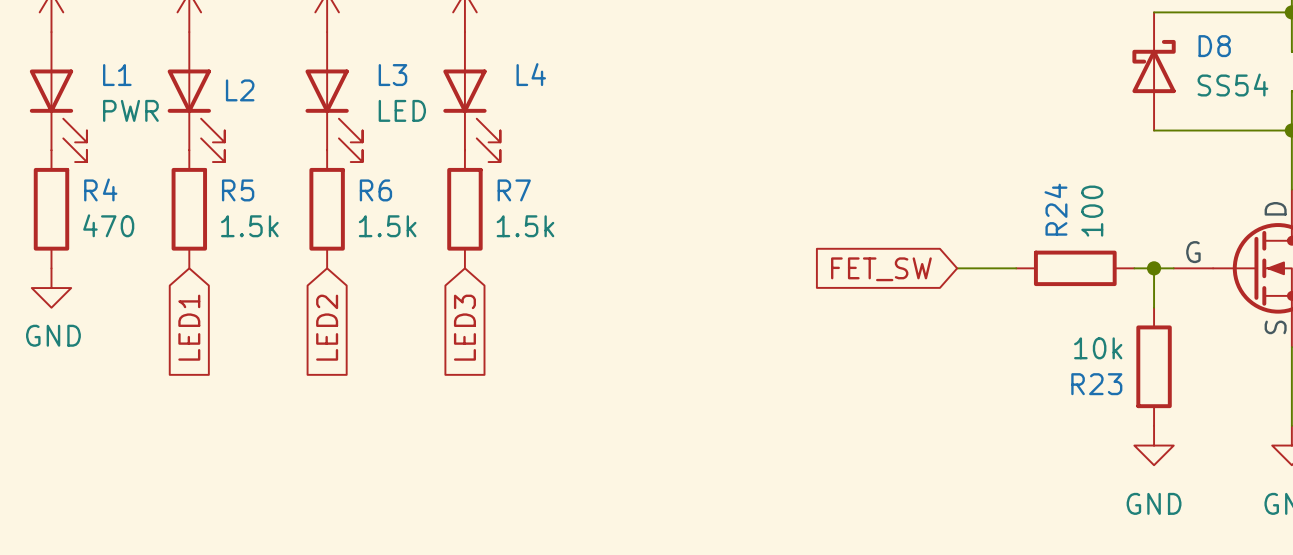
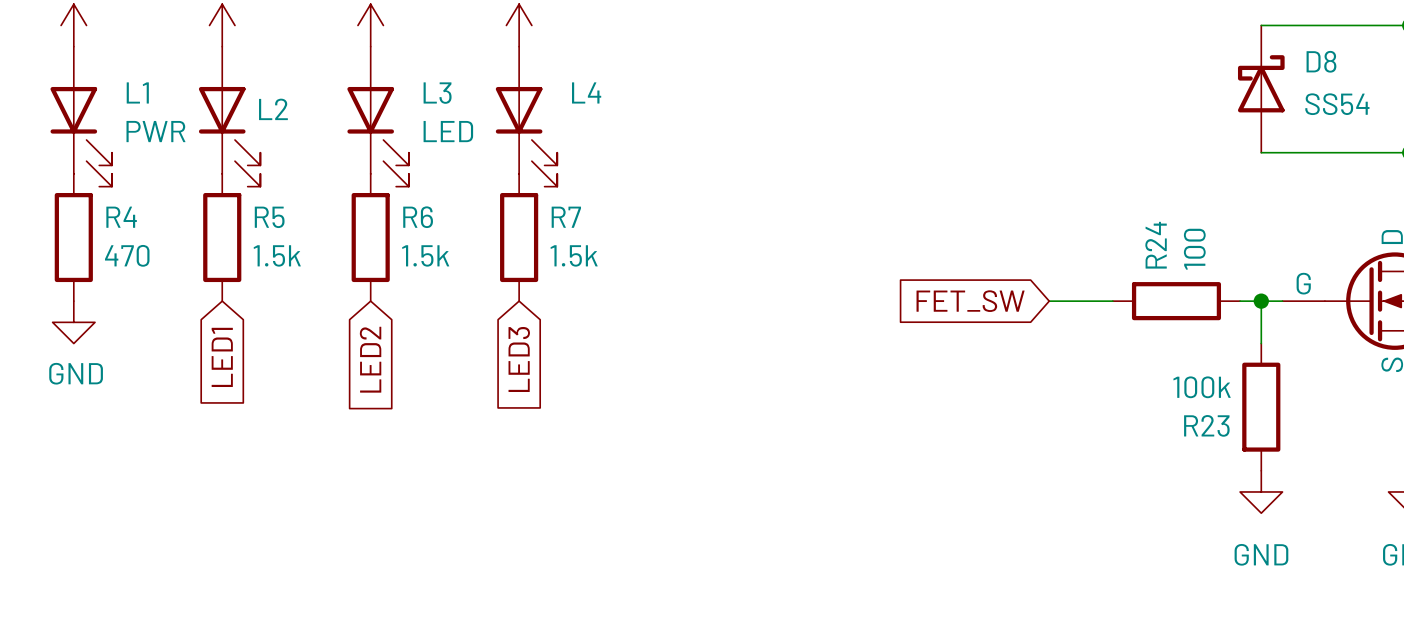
R23 value: 10k (1098, 348) -> 100k (1202, 387)

